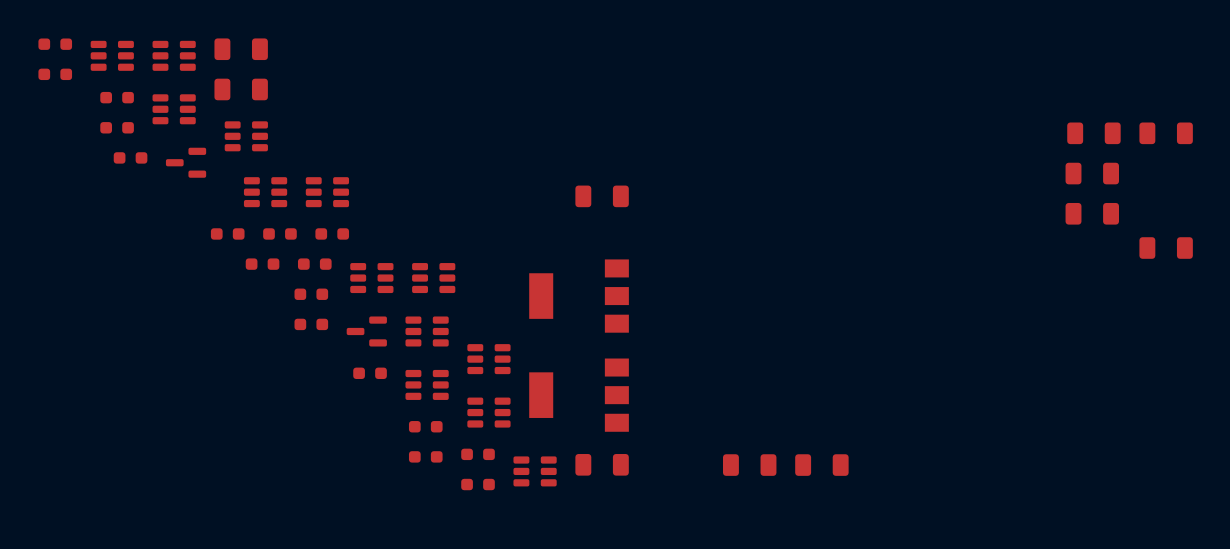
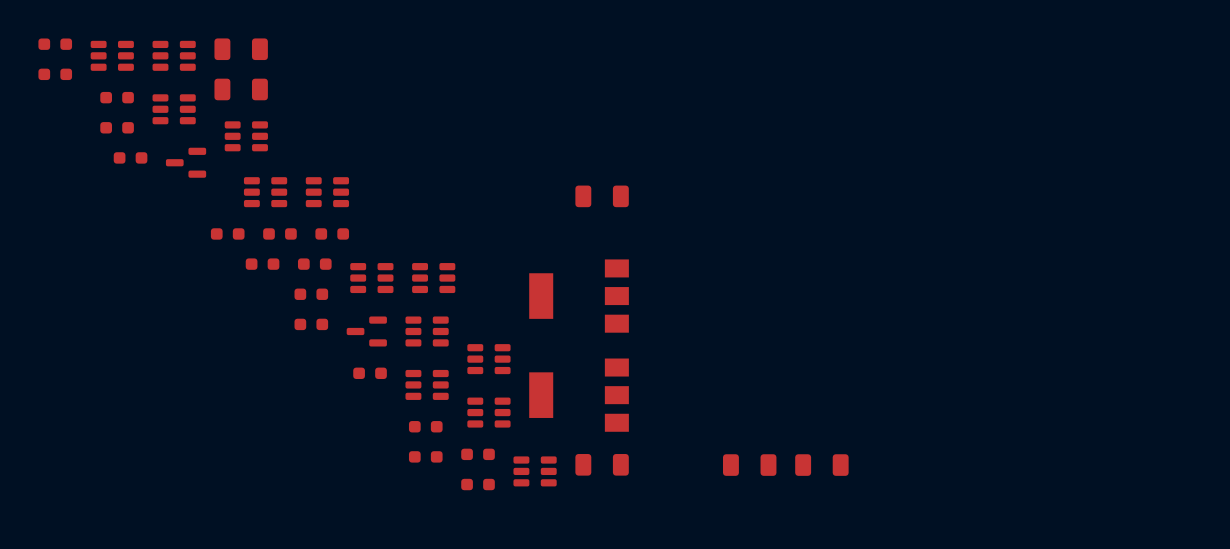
part: (1093, 133) -> none
part: (1166, 133) -> none
part: (1092, 173) -> none
part: (1092, 213) -> none
part: (1166, 248) -> none

